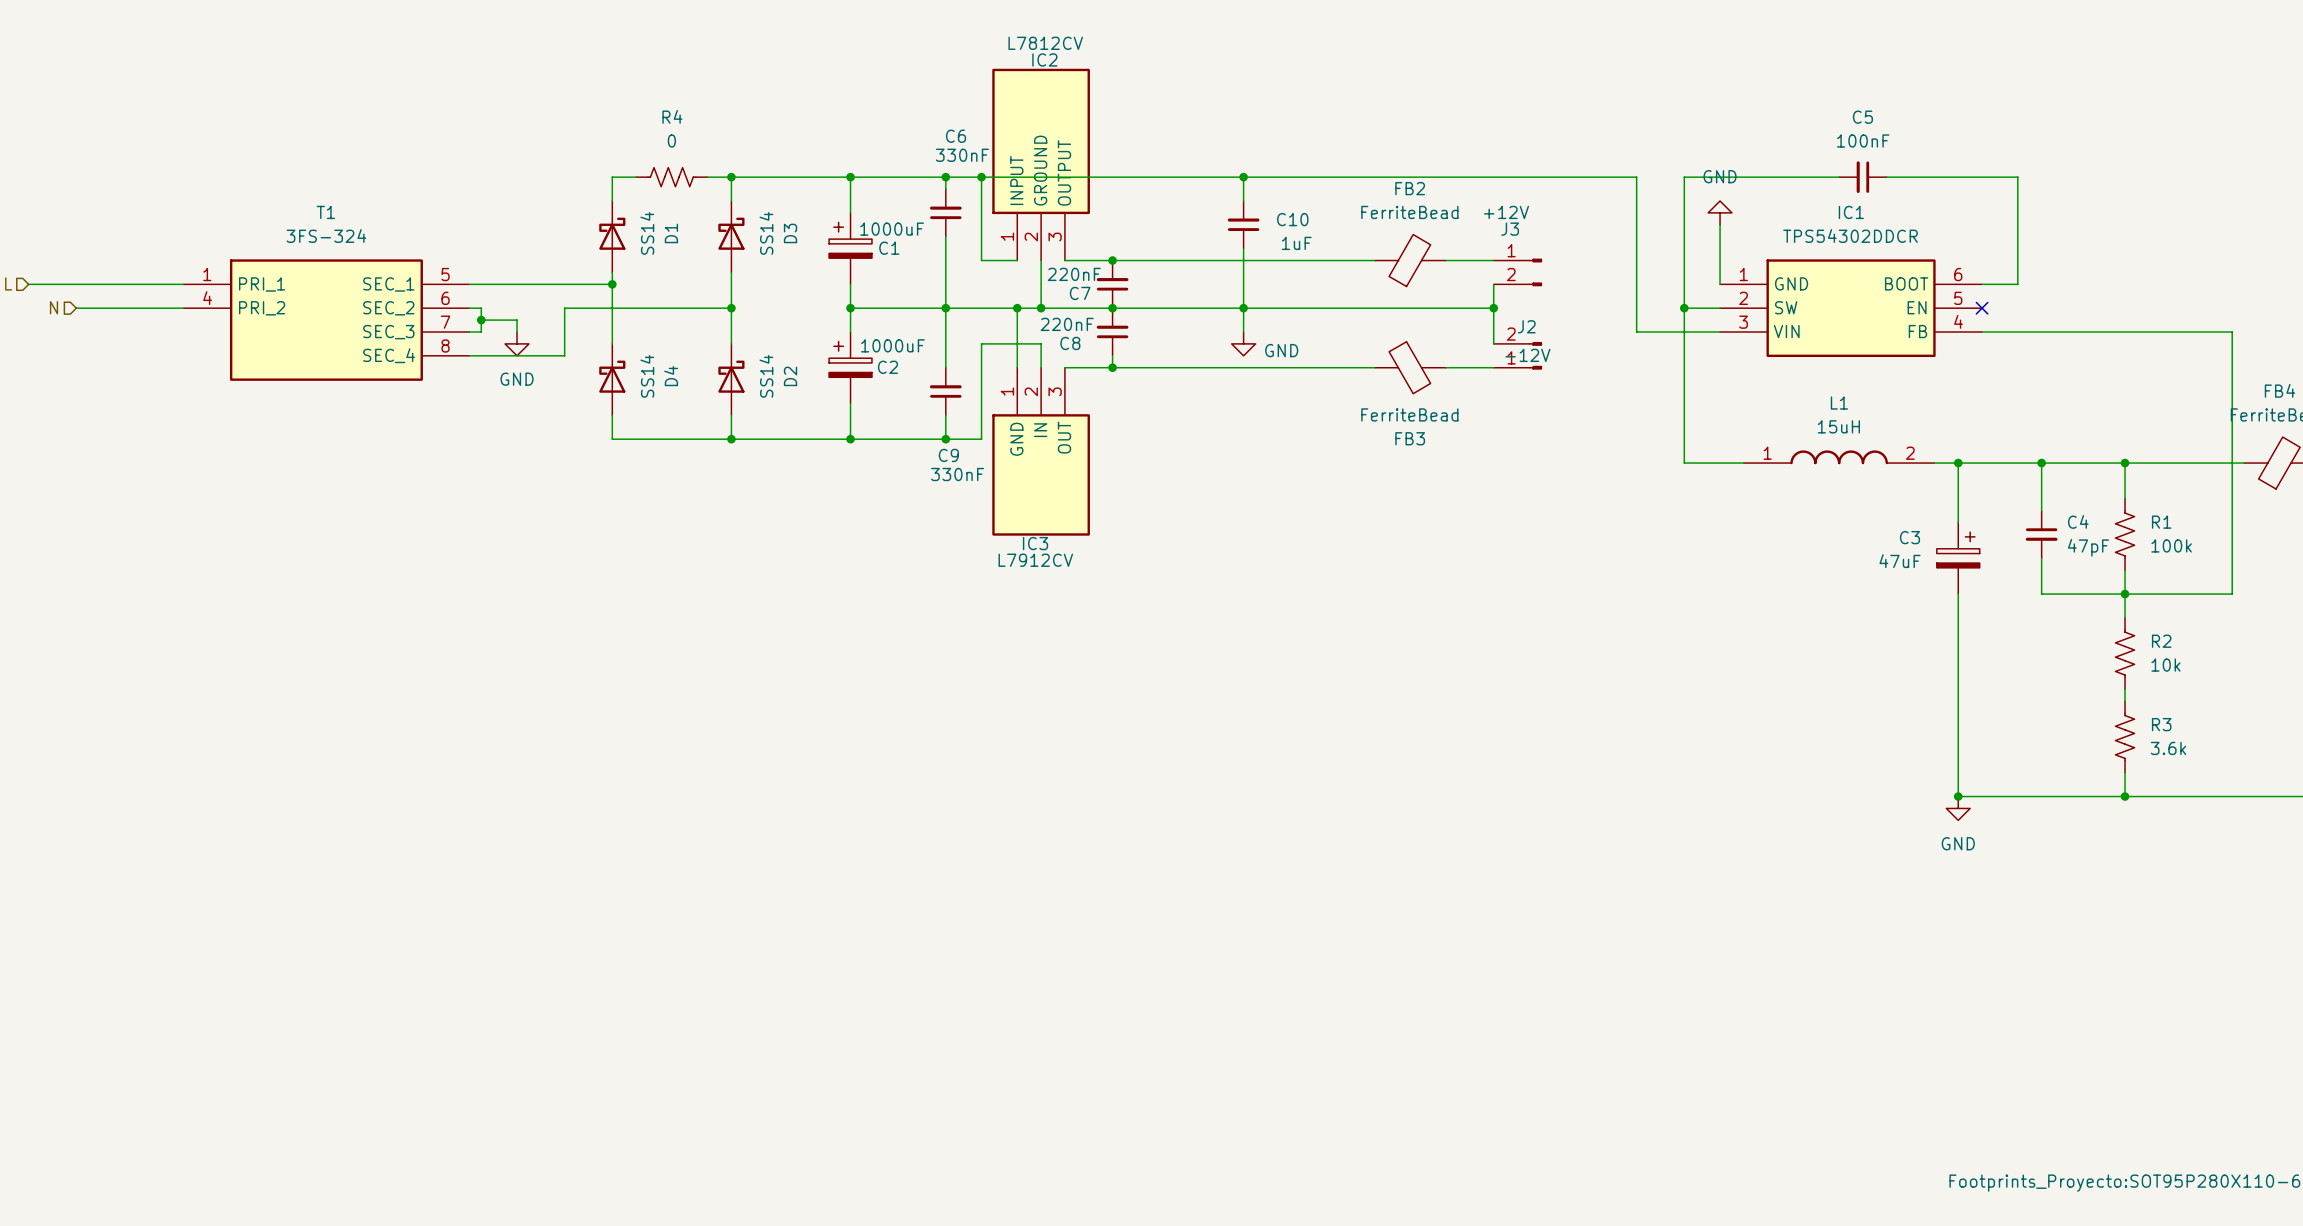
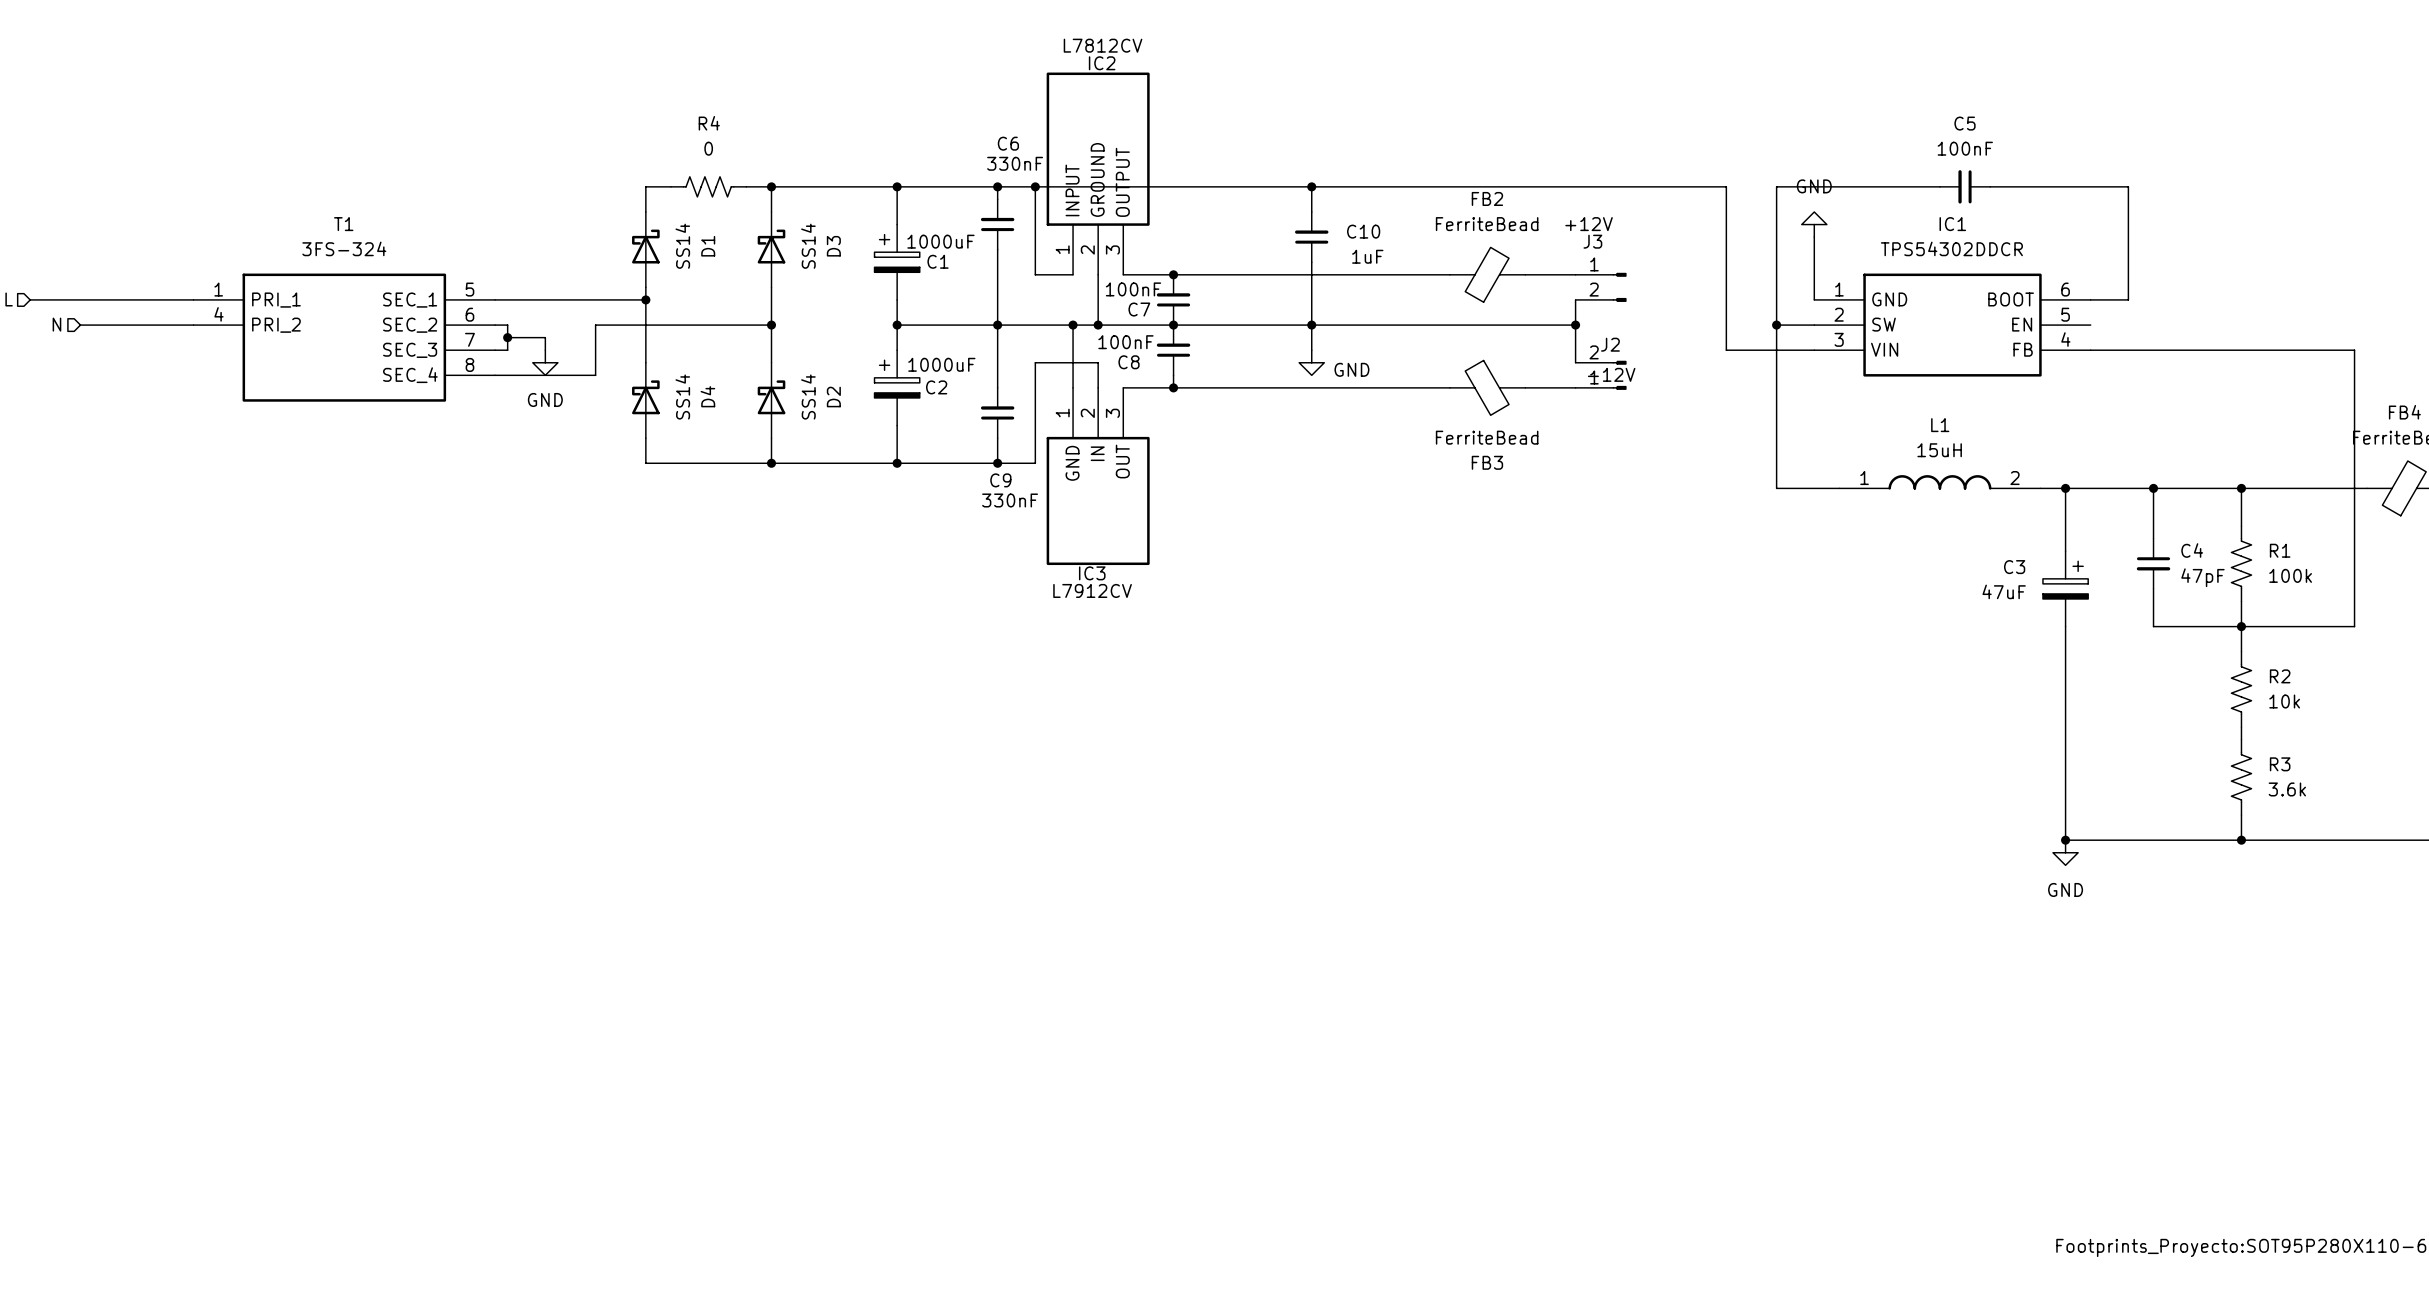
C7 value: 220nF (1074, 274) -> 100nF (1133, 289)
no-connect mark: (1982, 308) -> none
C8 value: 220nF (1067, 324) -> 100nF (1125, 342)

